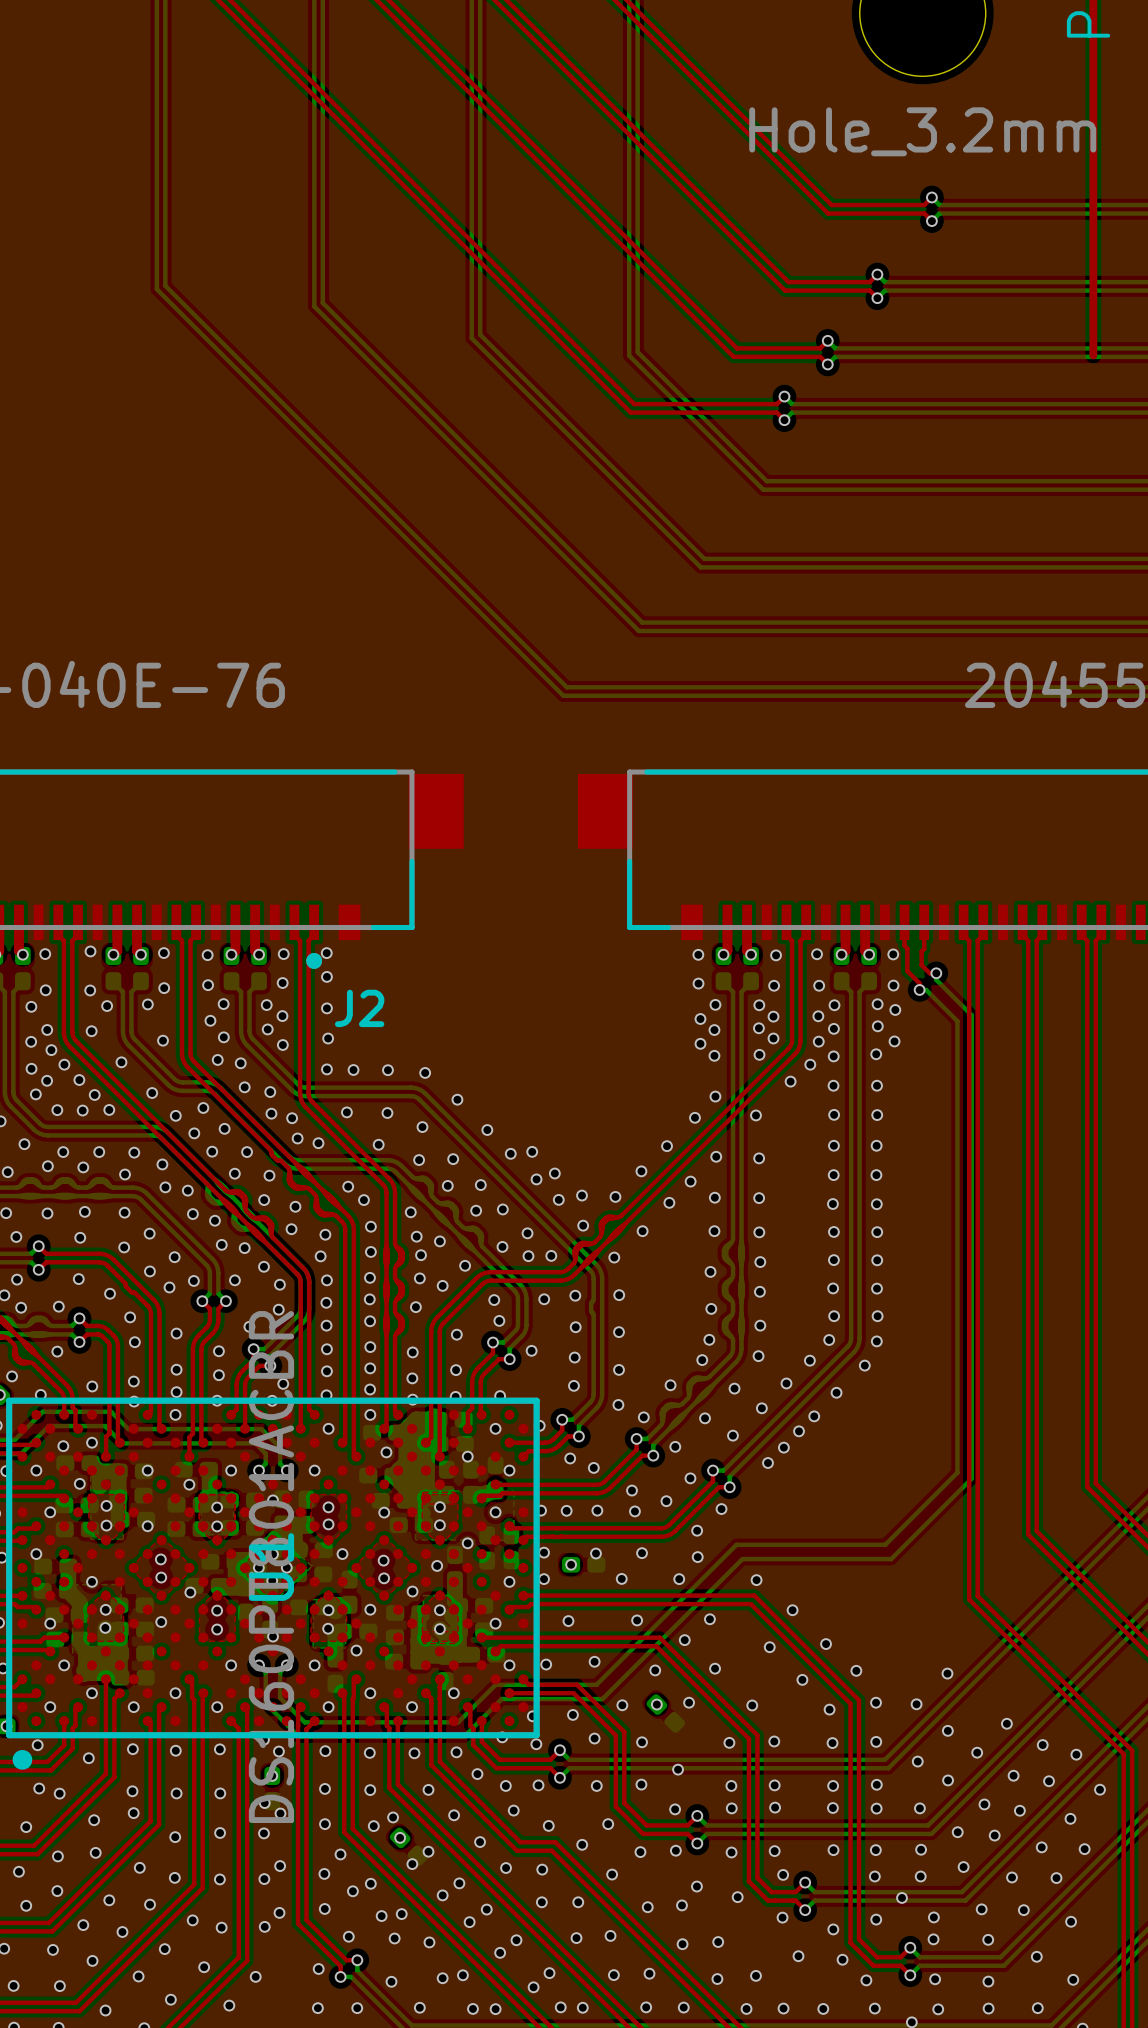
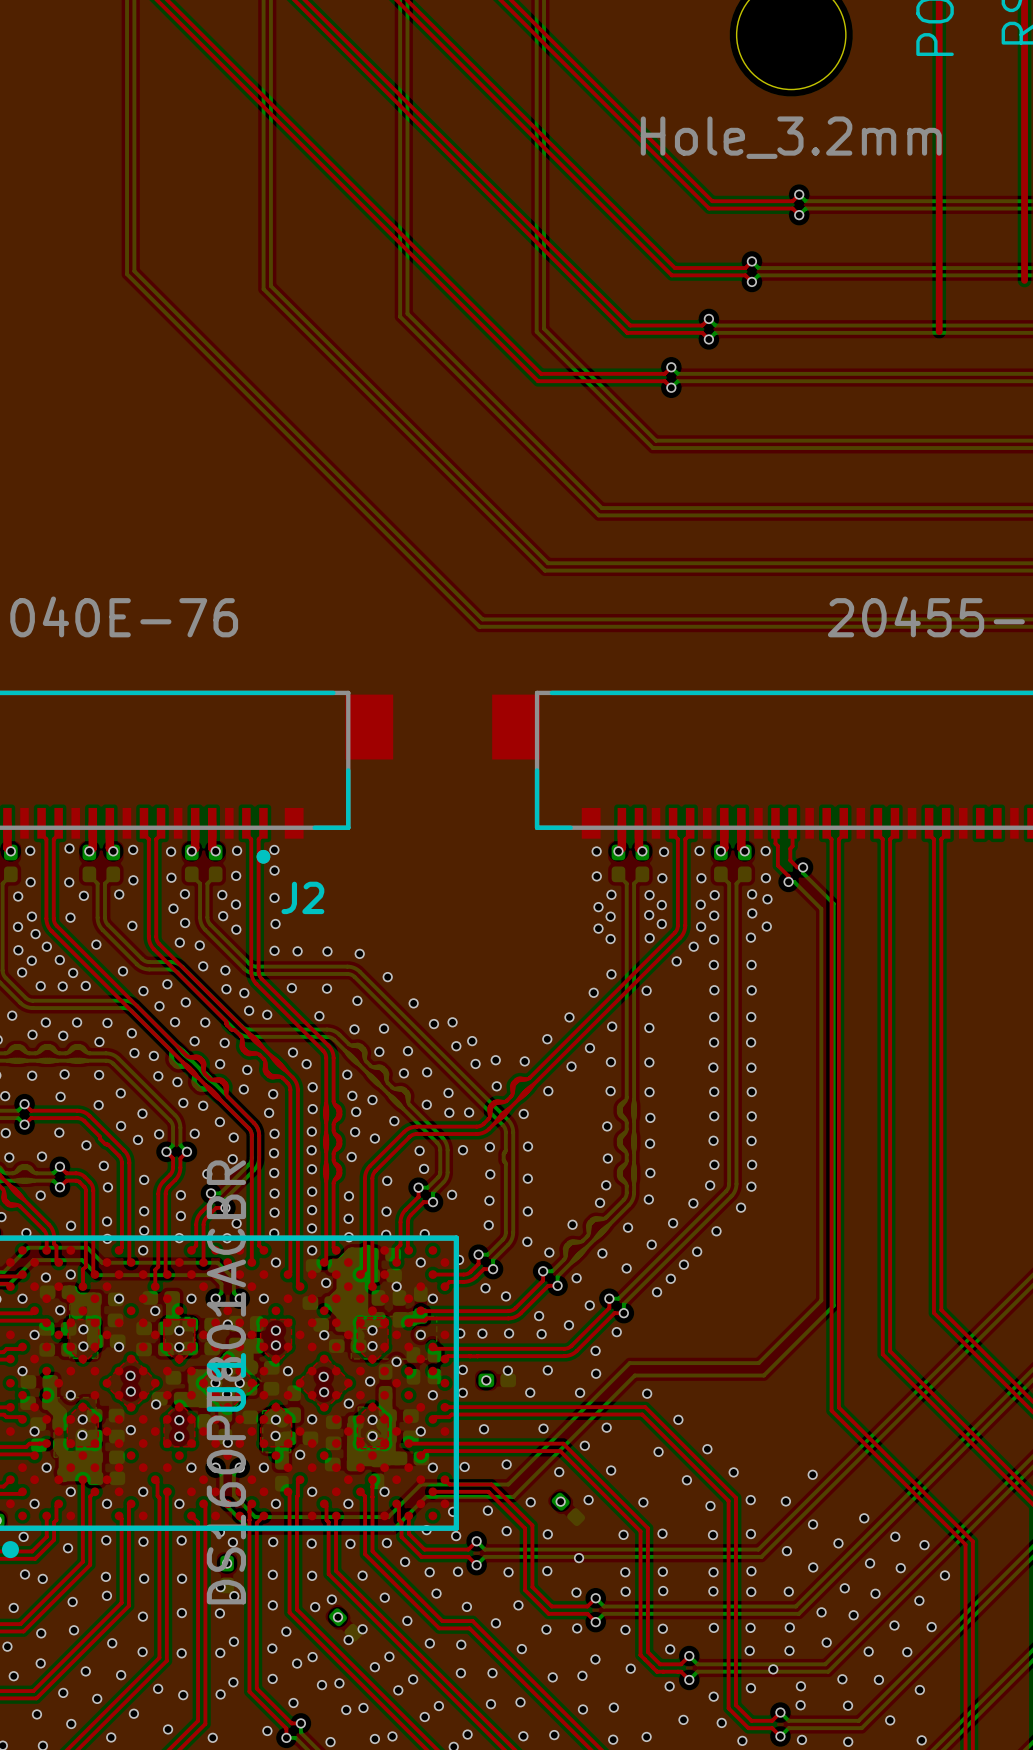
via position: (394, 1938) -> (346, 1709)

